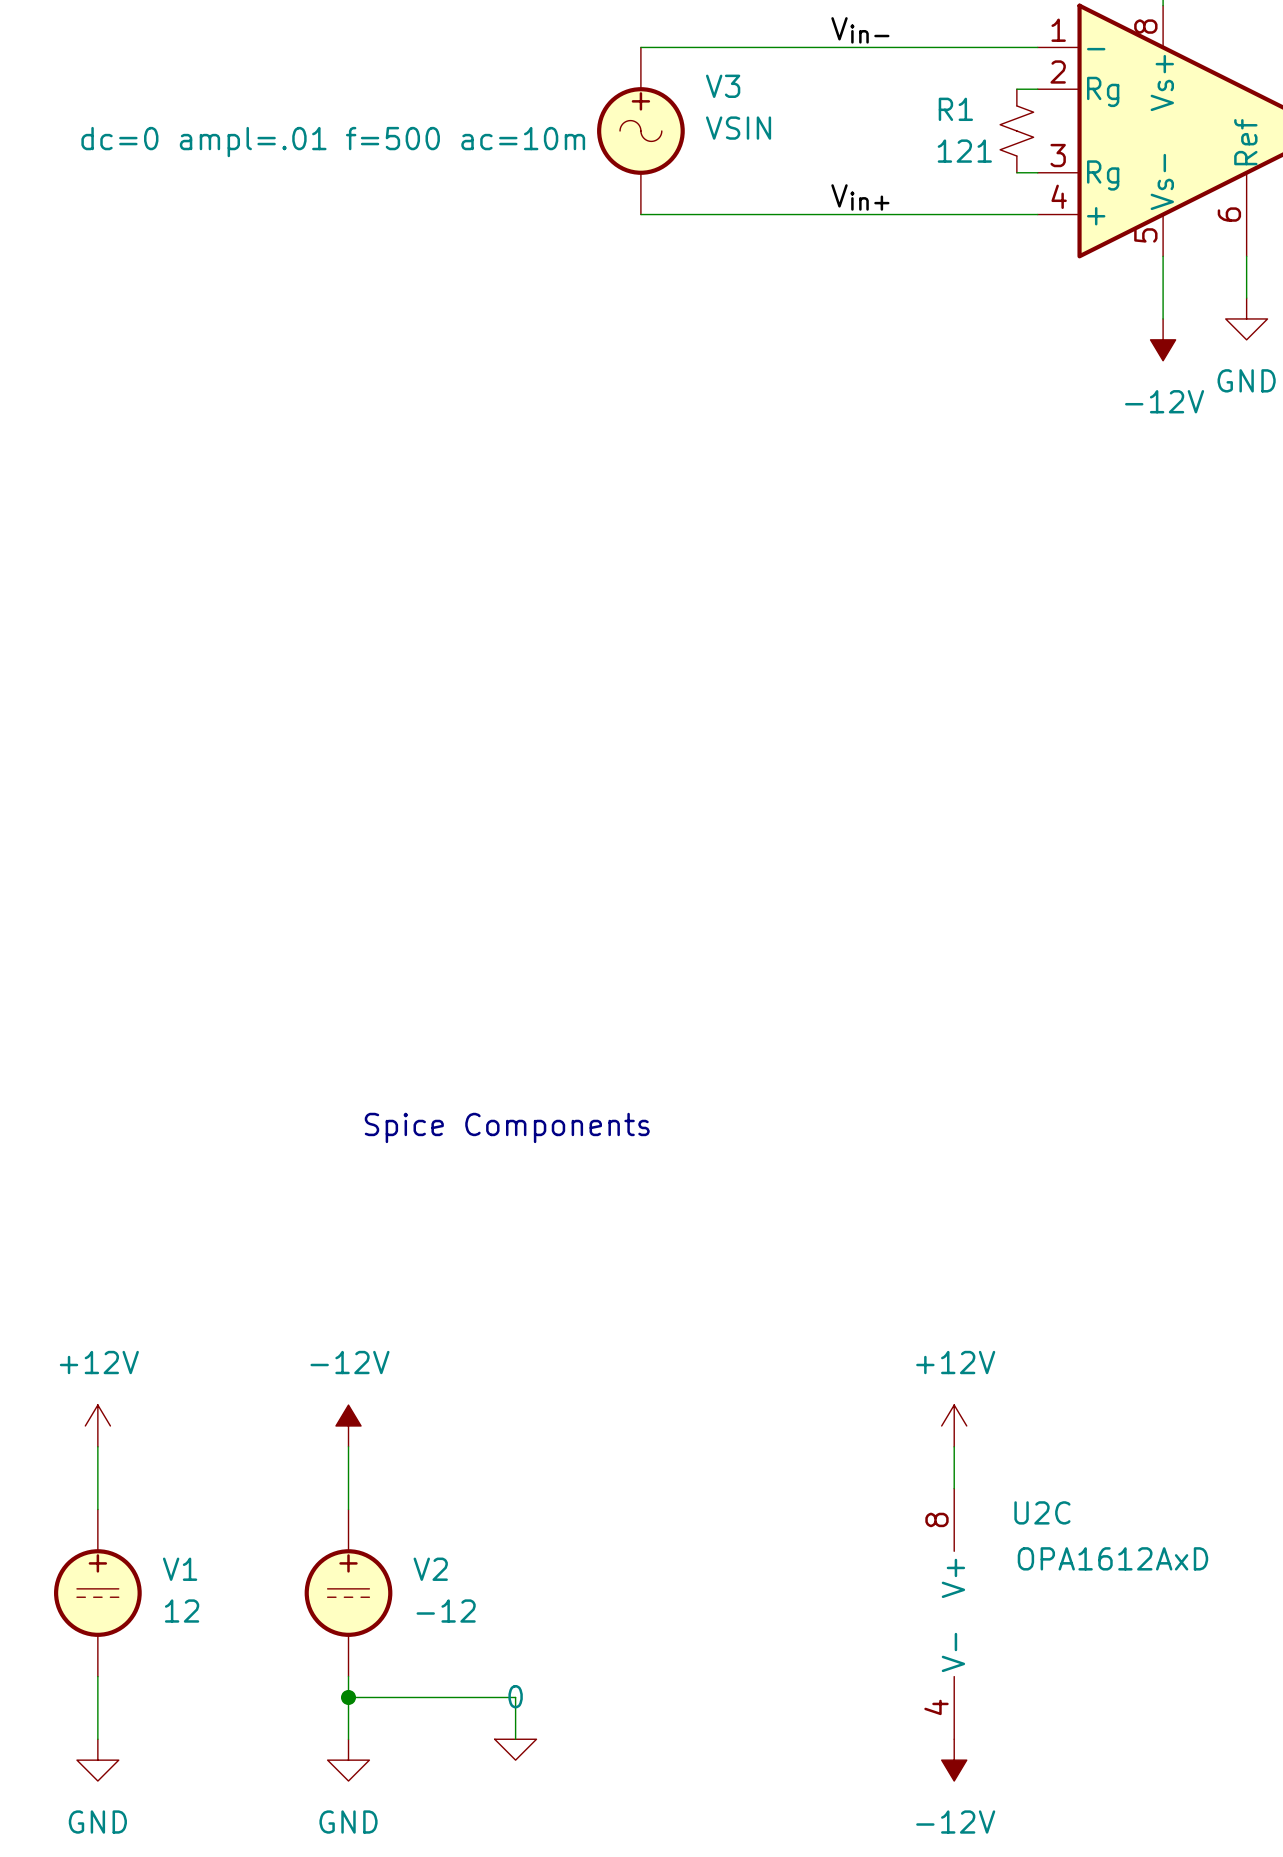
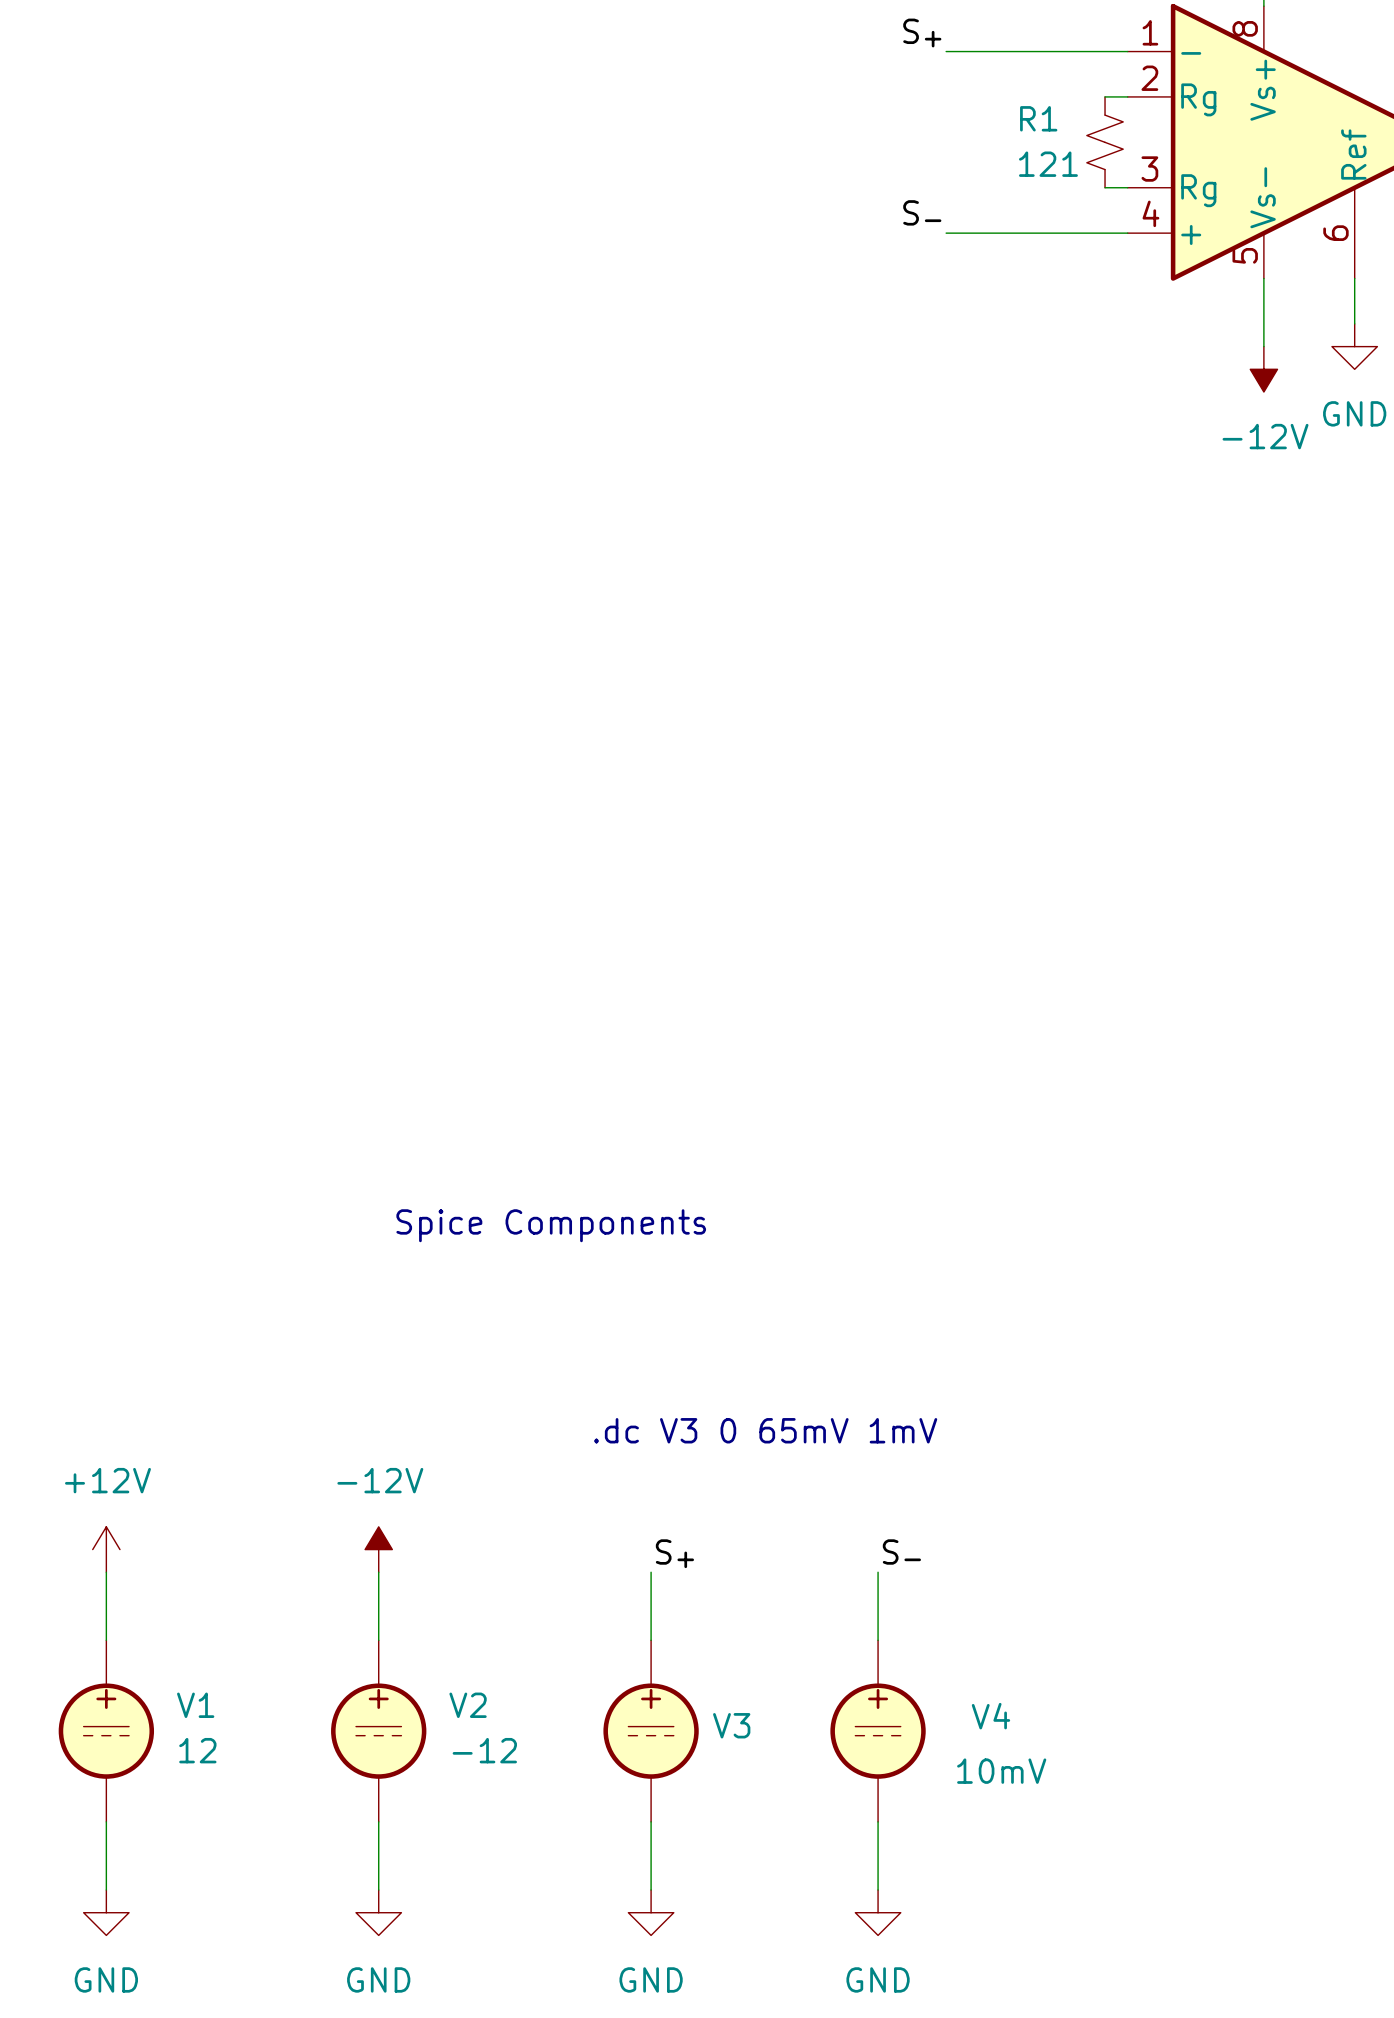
label: none -> S+ (922, 33)
label: Vin- (860, 30) -> none
V3 symbol: [597, 47, 685, 215] -> [603, 1640, 699, 1822]
wire: (640, 47) (870, 47) -> none
V3 name position: V3 (723, 86) -> V3 (731, 1725)
V3 value: VSIN (738, 128) -> none
V3 text: dc=0 ampl=.01 f=500 ac=10m (333, 142) -> none
label: none -> S- (922, 212)
label: Vin+ (860, 197) -> none
wire: (640, 214) (870, 214) -> none
text: none -> .dc V3 0 65mV 1mV (765, 1430)
power symbol: +12V (954, 1425) -> none
label: none -> S- (901, 1552)
label: none -> S+ (674, 1553)
wire: none -> (651, 1572) (651, 1640)
wire: none -> (878, 1572) (878, 1640)
wire: (954, 1446) (954, 1488) -> none
V4: none -> 10mV (878, 1731)
U2C: OPA1612AxD (954, 1613) -> none
wire: none -> (651, 1821) (651, 1890)
wire: none -> (878, 1821) (878, 1890)
wire: (348, 1697) (515, 1697) (515, 1739) -> none
junction: (348, 1697) -> none
power symbol: 0 (515, 1749) -> none
power symbol: none -> GND (651, 1912)
power symbol: none -> GND (878, 1912)
power symbol: -12V (954, 1760) -> none

